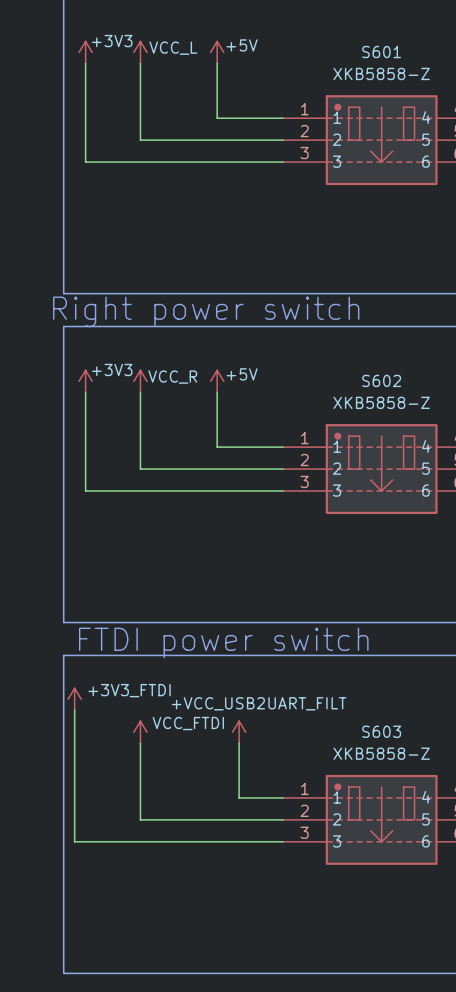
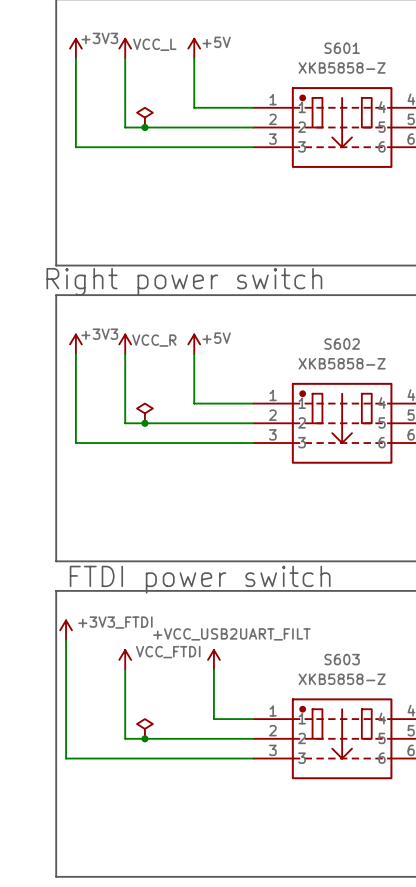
power symbol: none -> (144, 117)
junction: none -> (144, 127)
power symbol: none -> (144, 413)
junction: none -> (144, 423)
power symbol: none -> (144, 728)
junction: none -> (144, 738)

